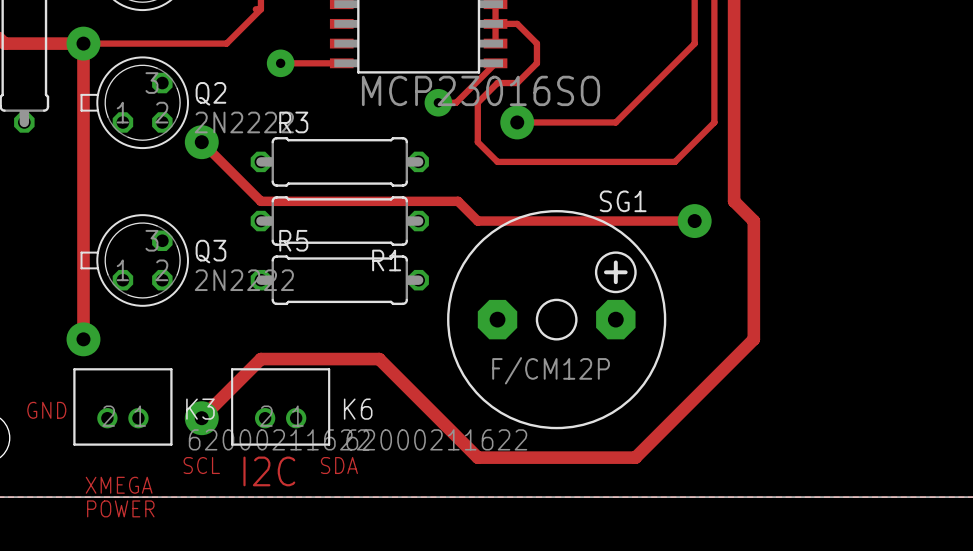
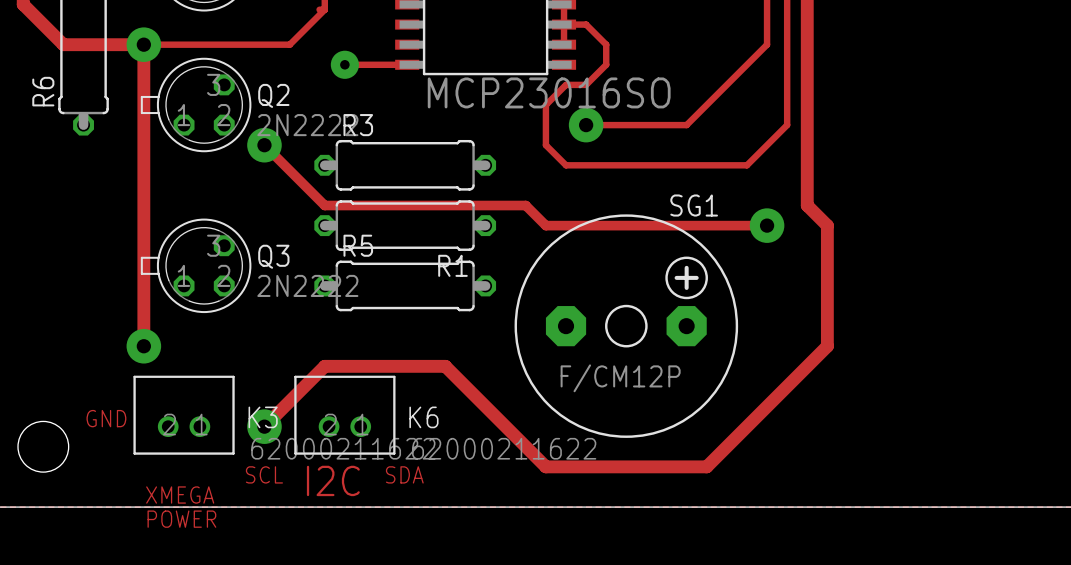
track: (495, 63) (456, 102) (438, 102) -> none
via: (438, 102) -> none

